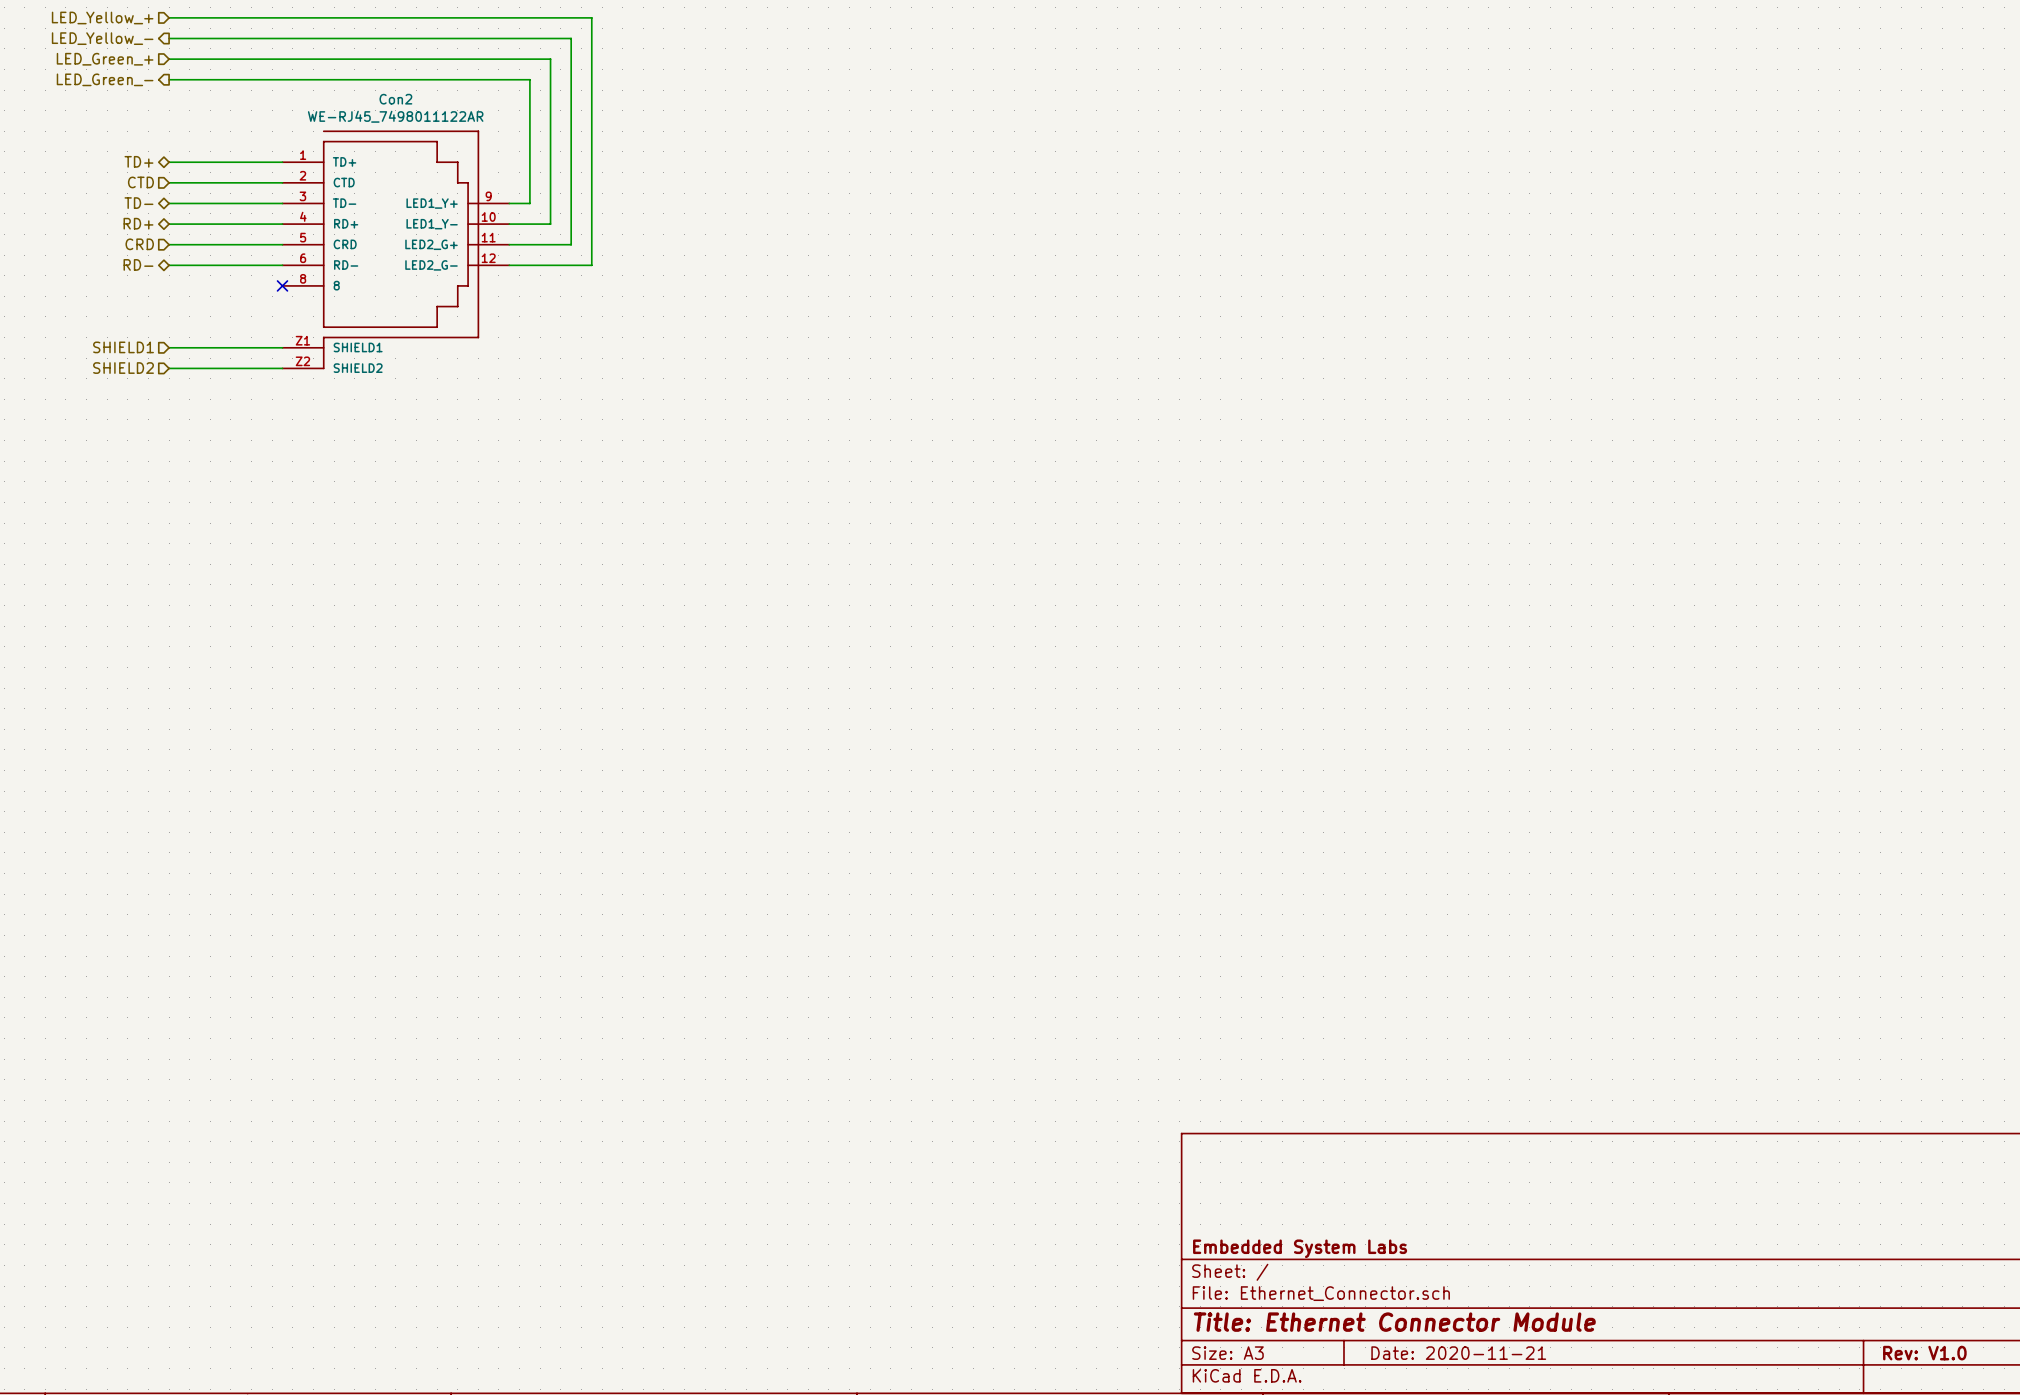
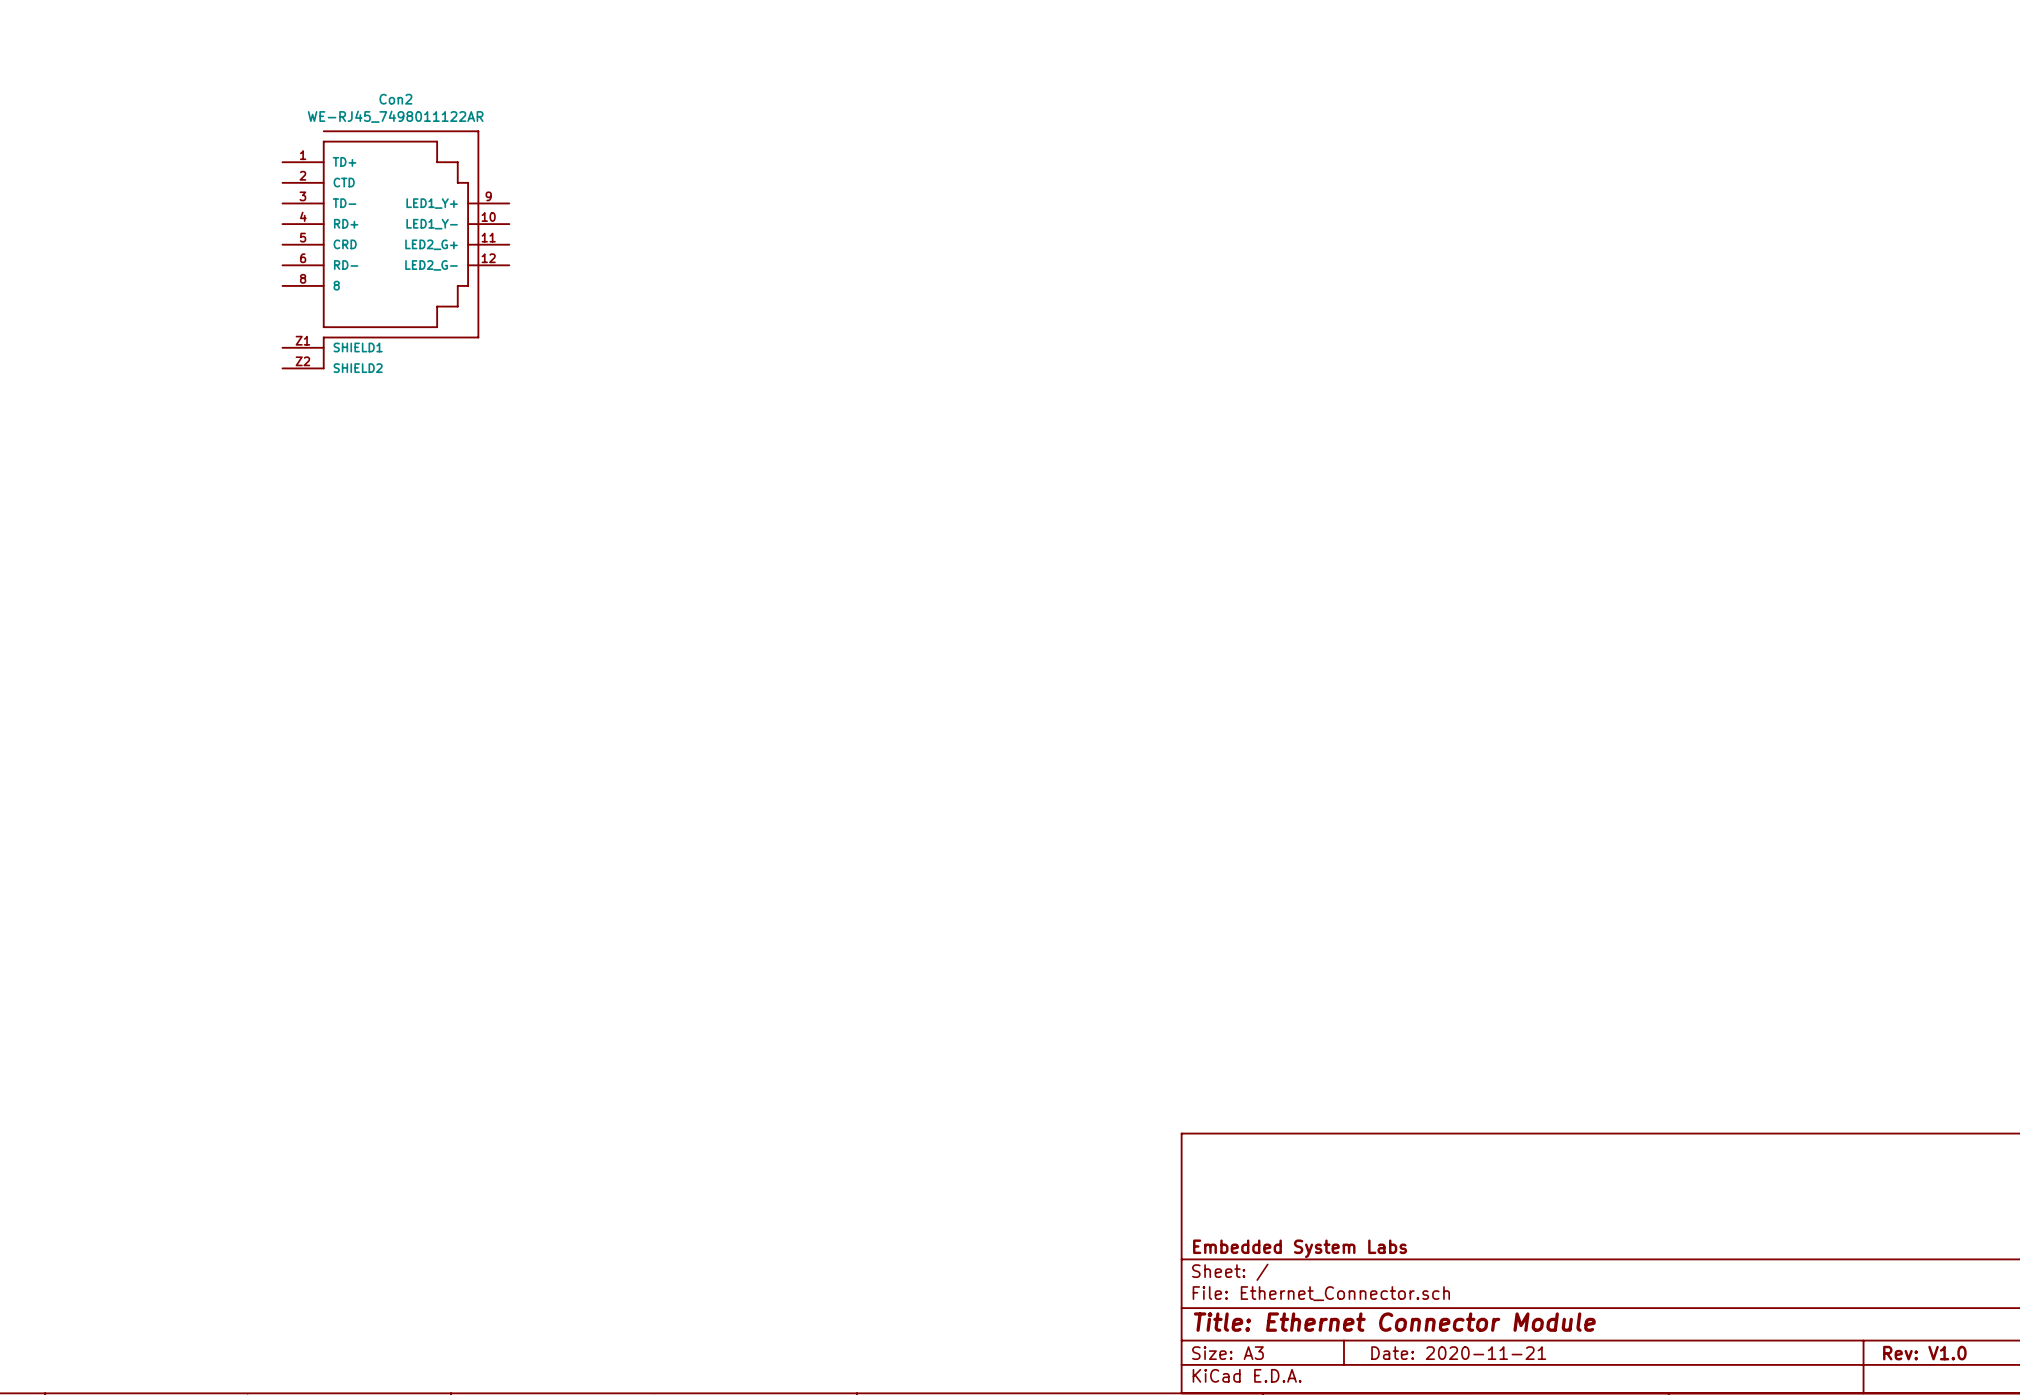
hierarchical label: LED_Yellow_+ (102, 17) -> none
wire: (169, 17) (591, 17) (591, 265) (509, 265) -> none
hierarchical label: LED_Yellow_- (102, 38) -> none
wire: (169, 38) (571, 38) (571, 244) (509, 244) -> none
hierarchical label: LED_Green_+ (105, 59) -> none
wire: (169, 59) (550, 59) (550, 224) (509, 224) -> none
hierarchical label: LED_Green_- (105, 79) -> none
wire: (169, 79) (529, 79) (529, 203) (509, 203) -> none
hierarchical label: TD+ (138, 161) -> none
wire: (169, 162) (282, 162) -> none
hierarchical label: CTD (140, 182) -> none
wire: (169, 182) (282, 182) -> none
hierarchical label: TD- (138, 203) -> none
wire: (169, 203) (282, 203) -> none
hierarchical label: RD+ (138, 223) -> none
wire: (169, 224) (282, 224) -> none
hierarchical label: CRD (139, 244) -> none
wire: (169, 244) (282, 244) -> none
hierarchical label: RD- (138, 264) -> none
wire: (169, 265) (282, 265) -> none
no-connect mark: (282, 285) -> none
hierarchical label: SHIELD1 (123, 347) -> none
wire: (169, 347) (282, 347) -> none
hierarchical label: SHIELD2 (123, 368) -> none
wire: (169, 368) (282, 368) -> none

